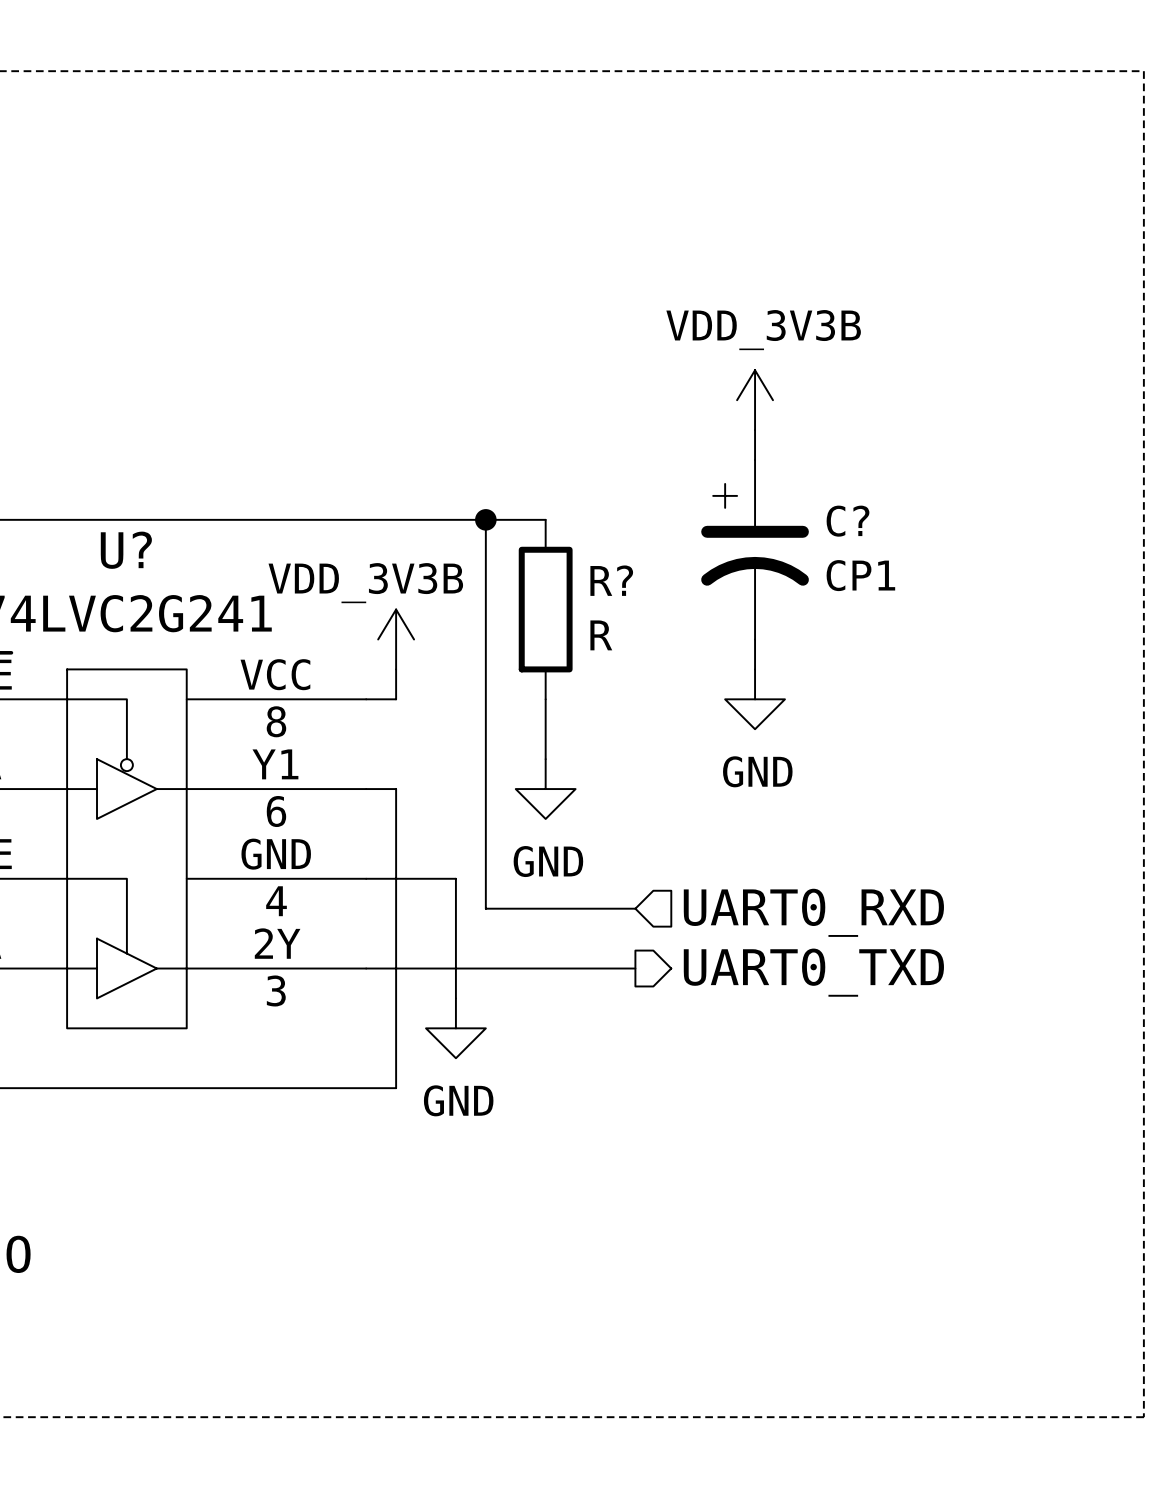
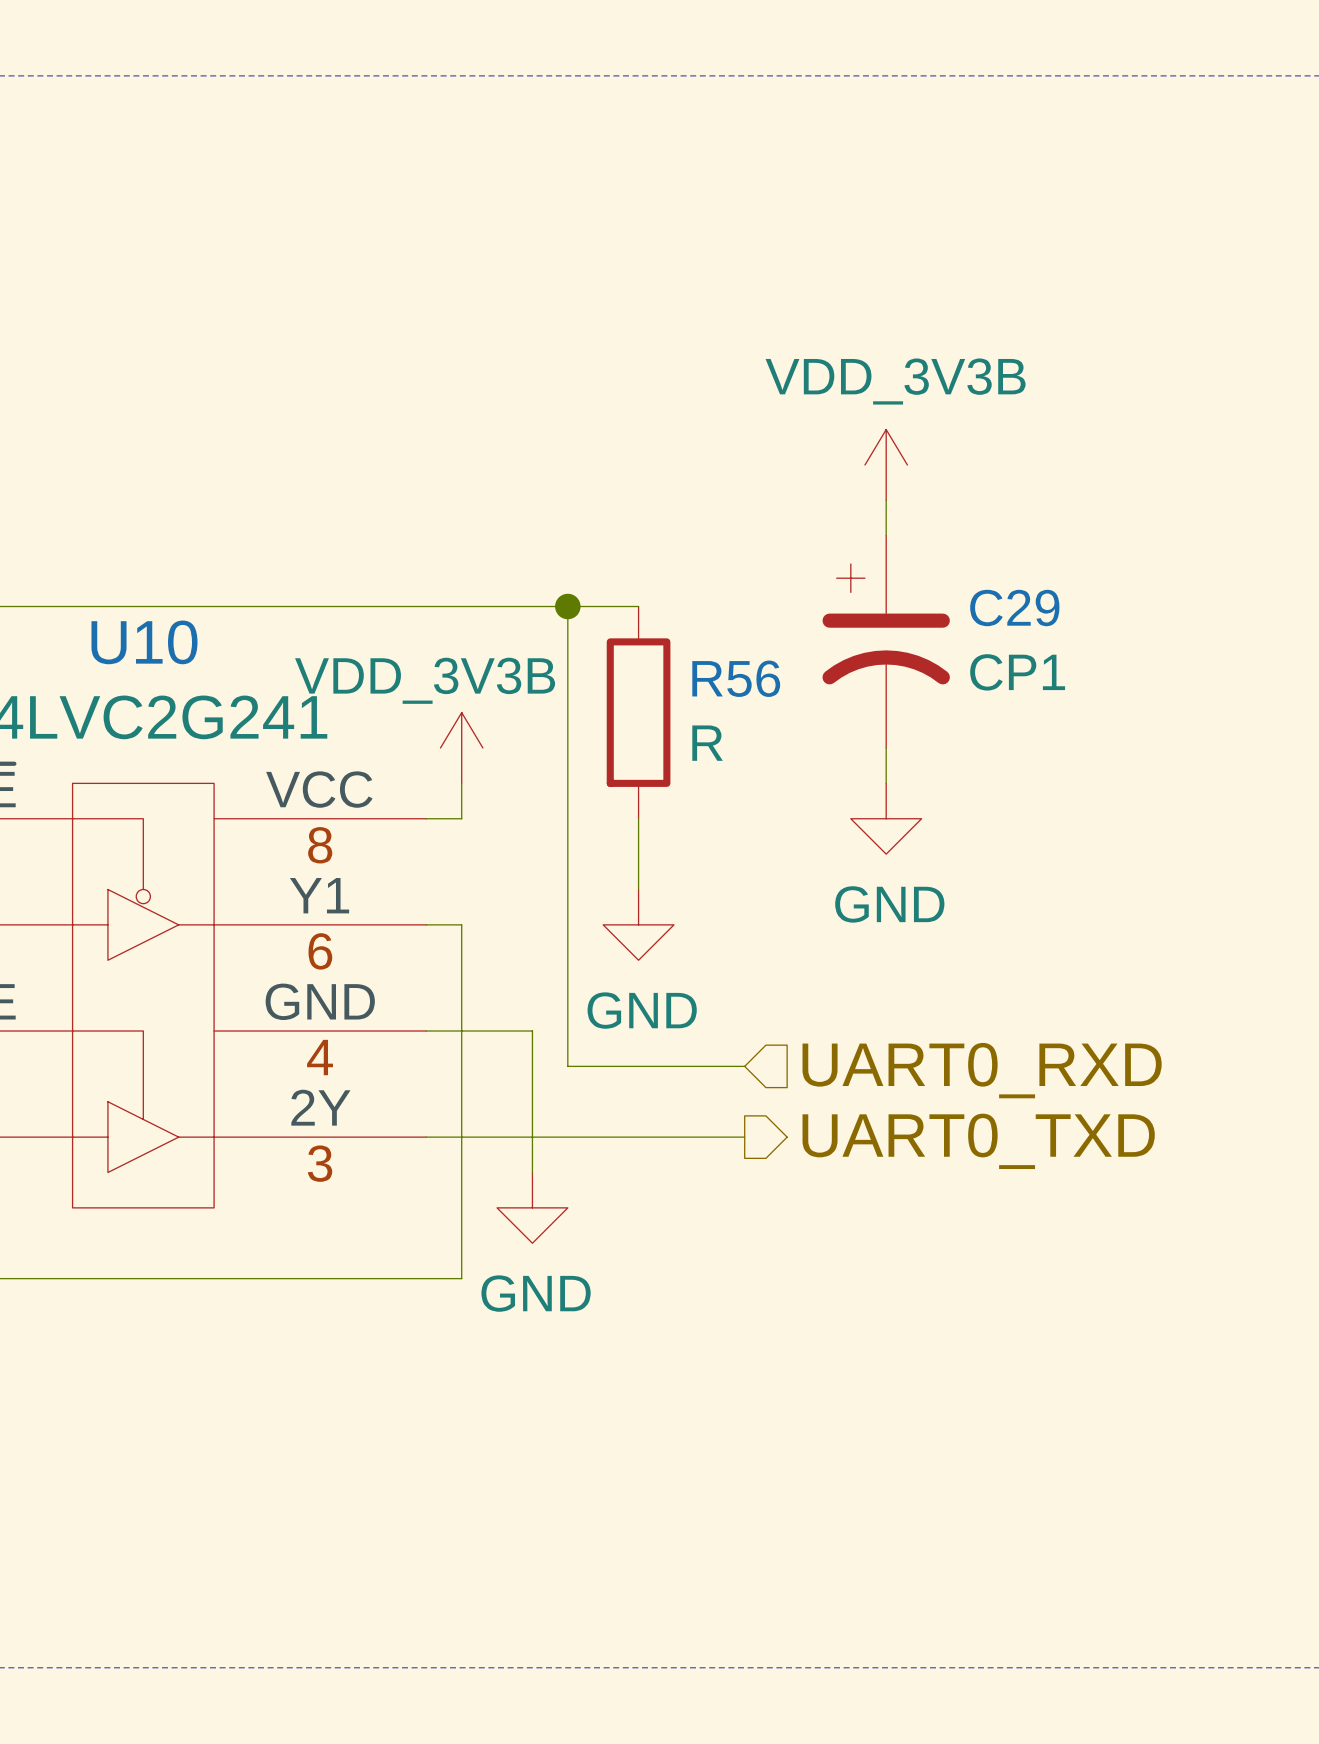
C? name: C? (848, 521) -> C29 (1014, 608)
U? name: U? (126, 550) -> U10 (144, 642)
R? name: R? (611, 580) -> R56 (736, 678)

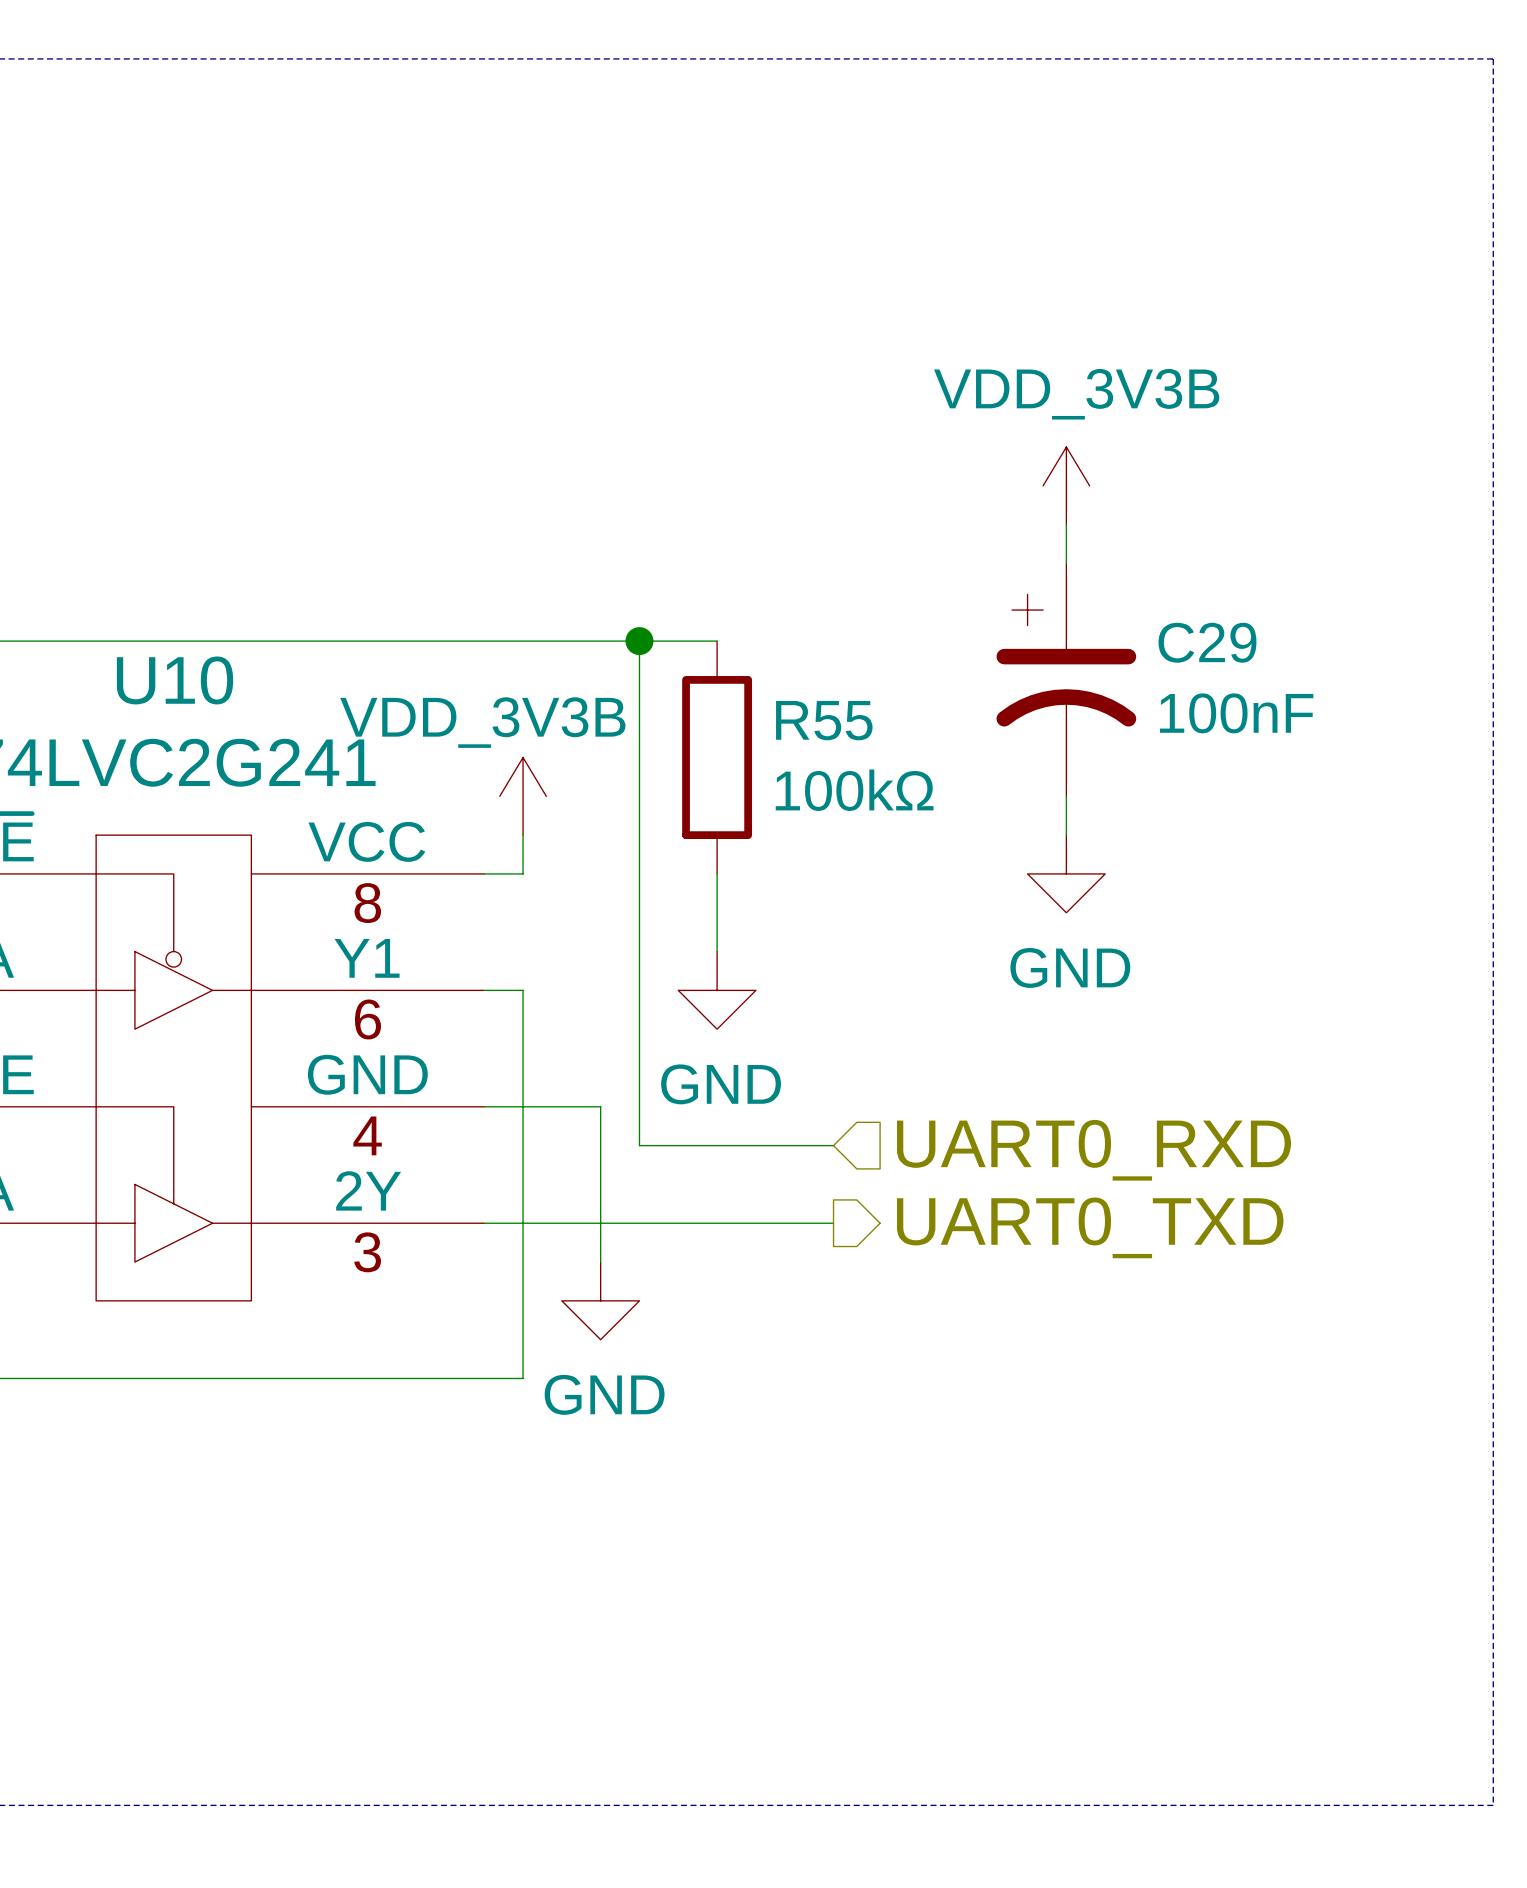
power symbol position: VDD_3V3B (886, 465) -> VDD_3V3B (1066, 485)
wire: (886, 500) (886, 535) -> (1066, 524) (1066, 563)
C29 position: (886, 641) -> (1066, 679)
C29 value: CP1 (1017, 672) -> 100nF (1236, 713)
R56 name: R56 (736, 678) -> R55 (824, 720)
R56 value: R (707, 743) -> 100kΩ (854, 790)
wire: (886, 748) (886, 783) -> (1066, 796) (1066, 835)
power symbol position: GND (886, 818) -> GND (1066, 873)

